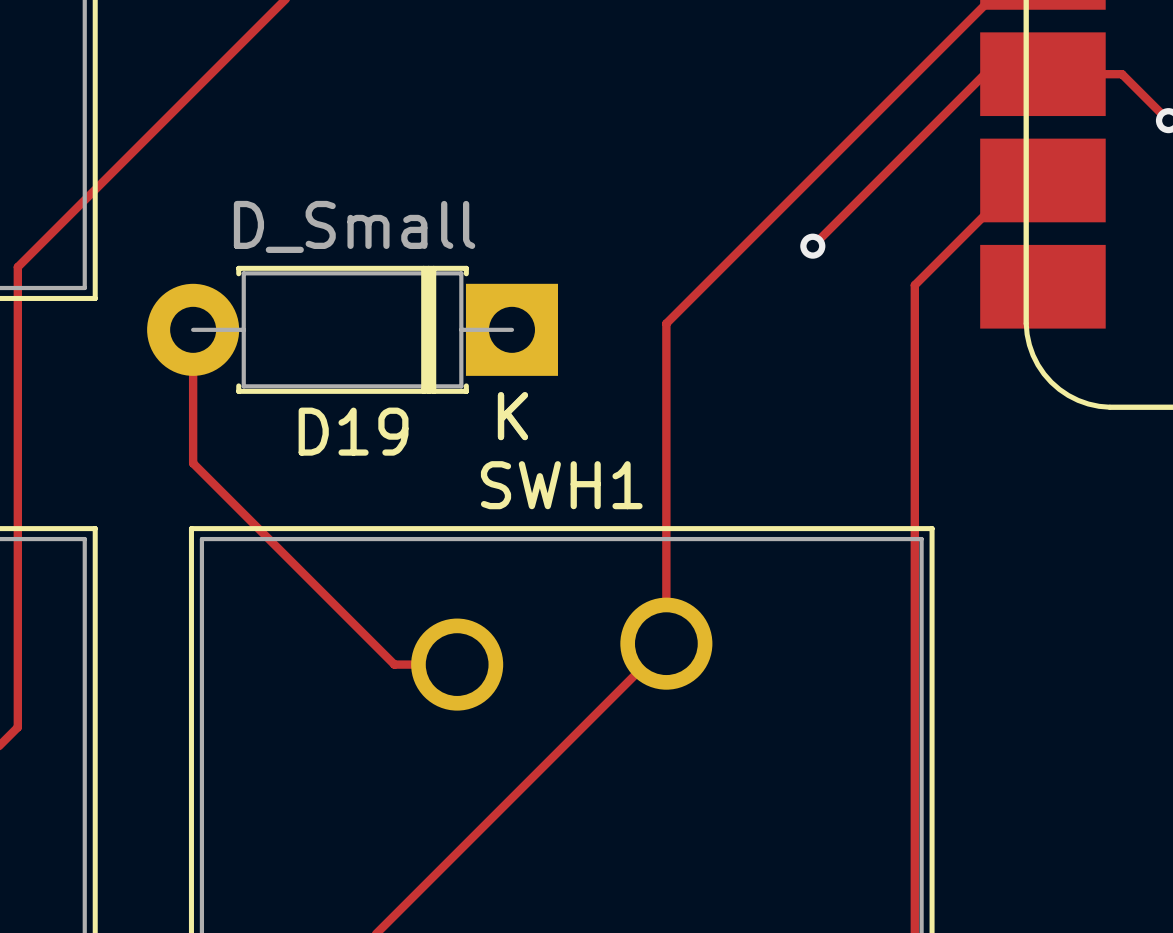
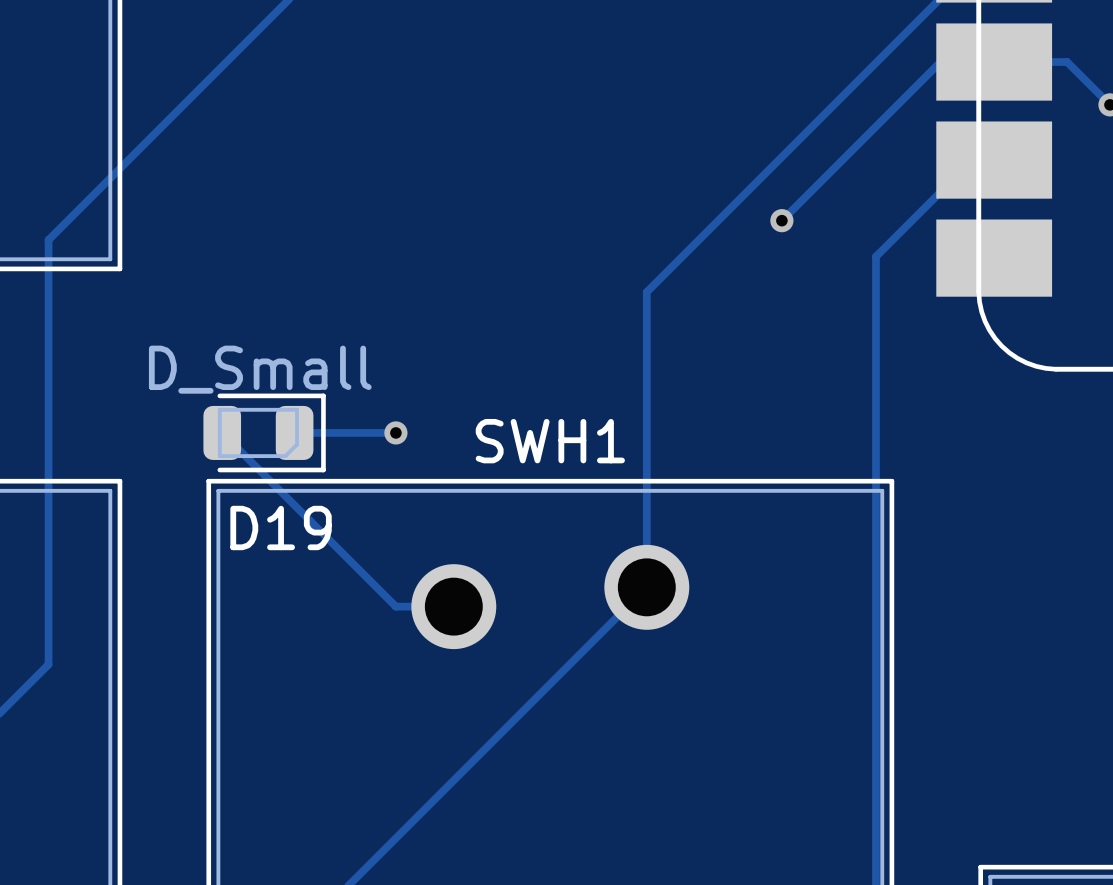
D19 footprint: [147, 265, 559, 394] -> [203, 393, 326, 473]
track: (193, 329) (193, 463) (206, 476) -> none
track: none -> (294, 432) (395, 432)
via: none -> (395, 432)

